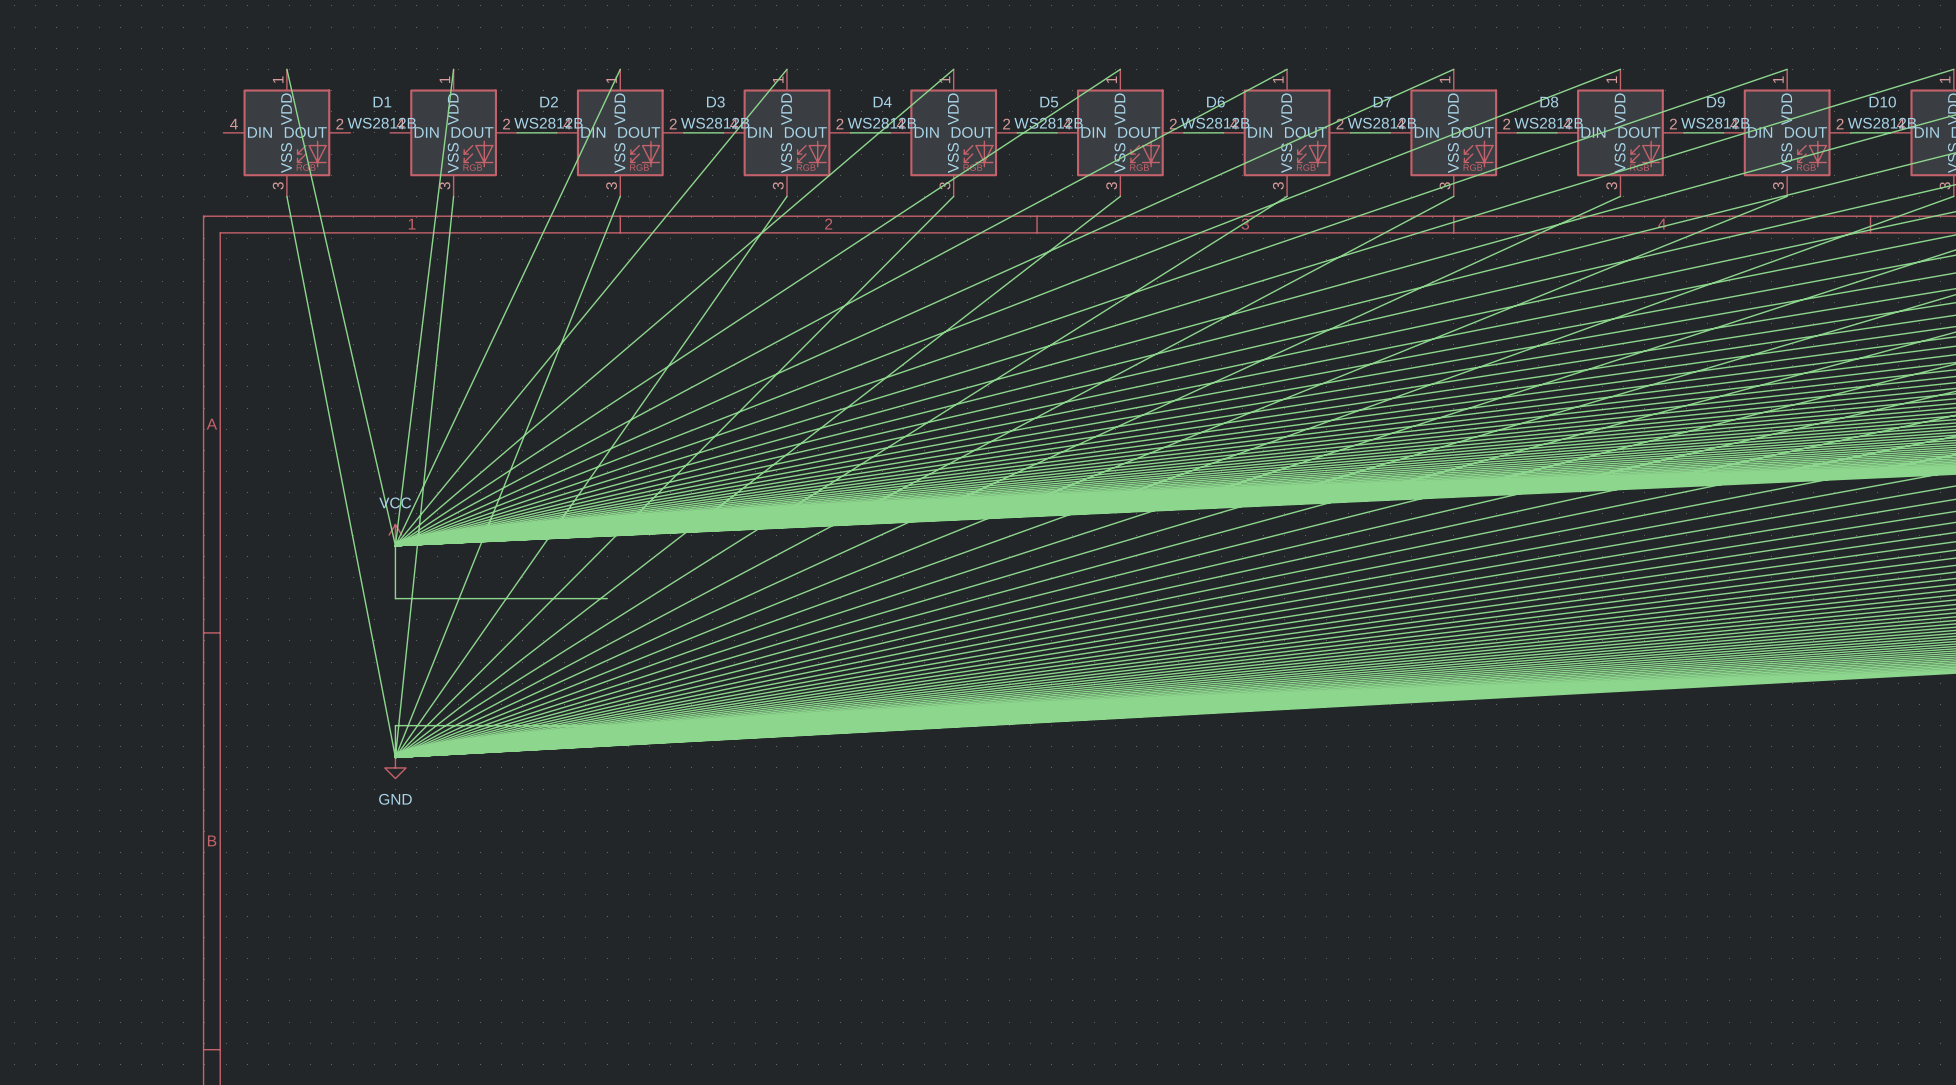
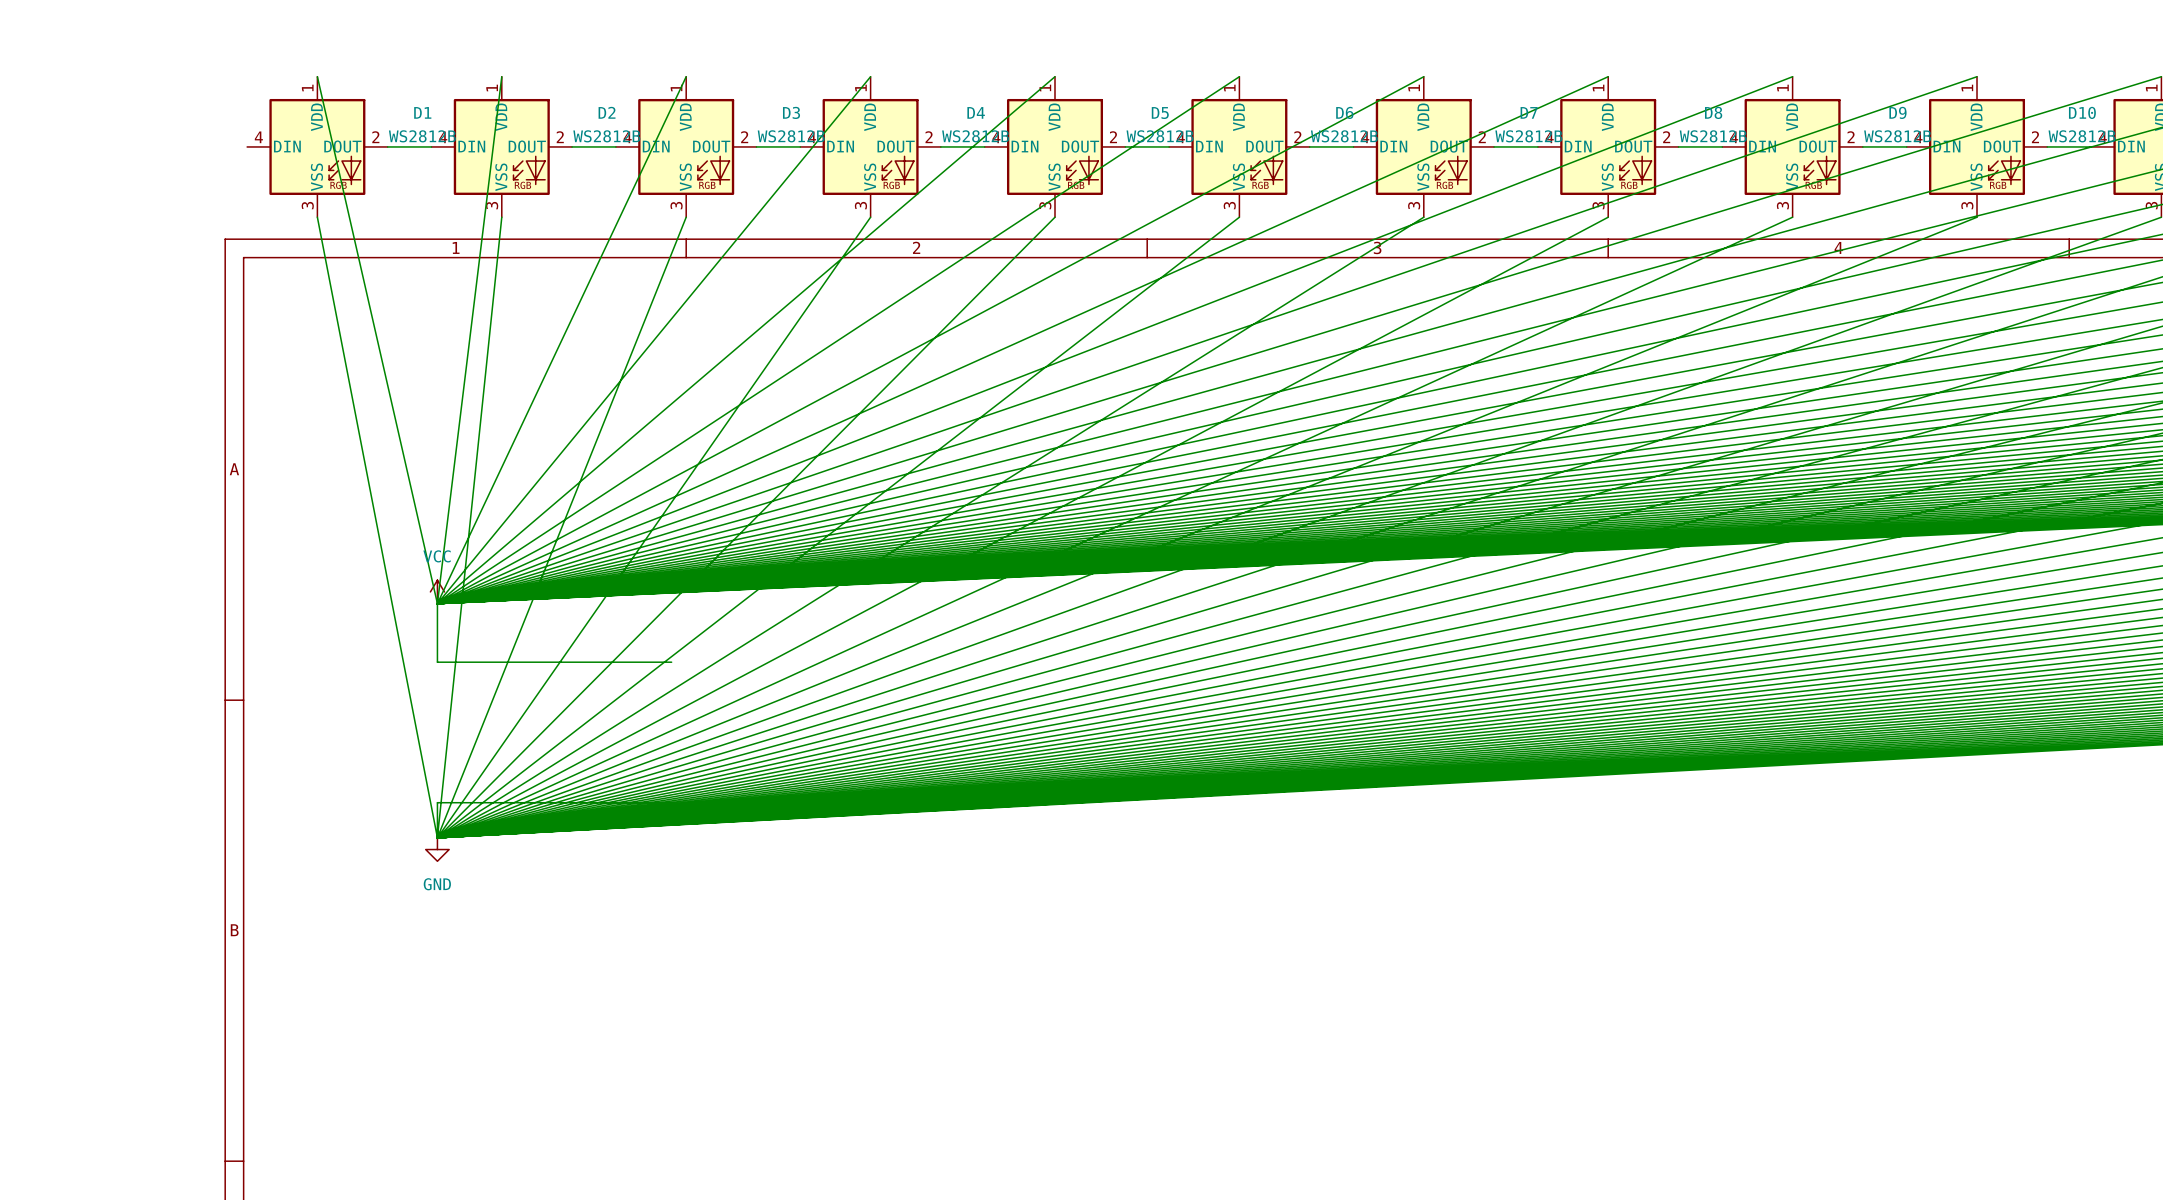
wire: none -> (387, 146) (431, 146)

